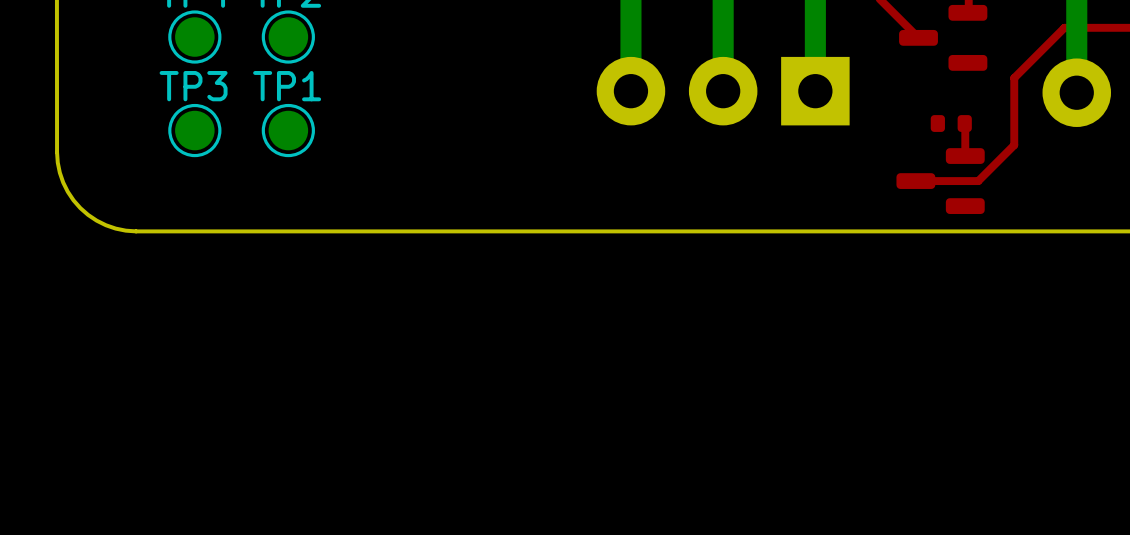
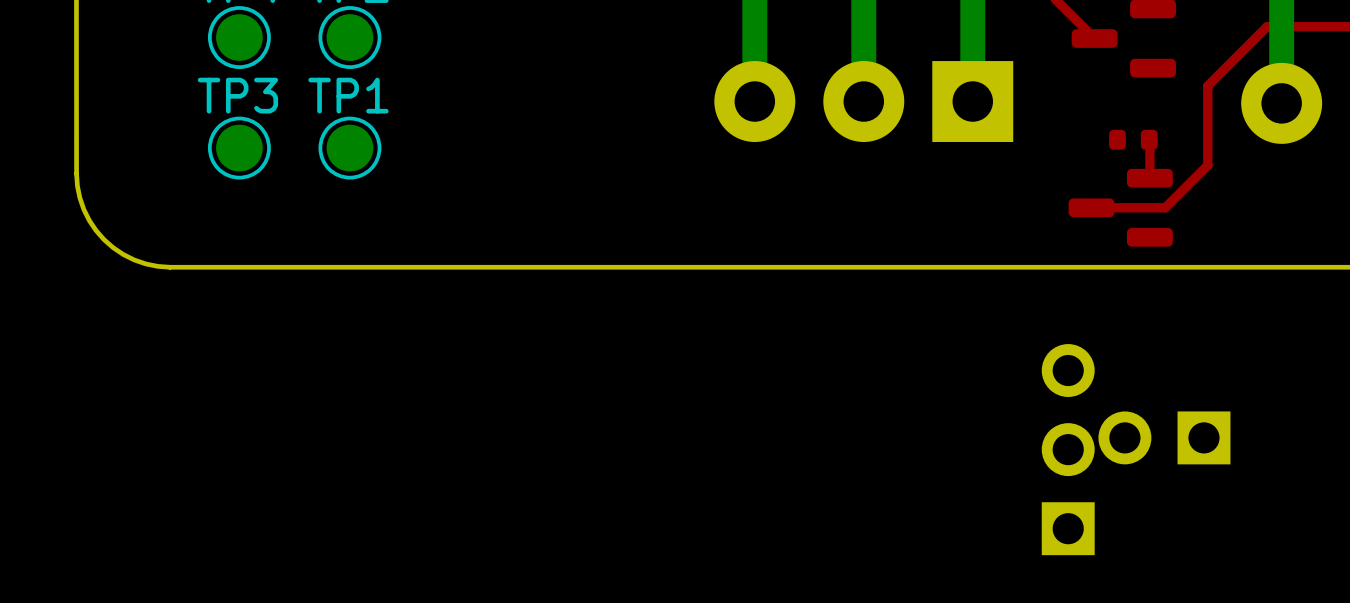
part: none -> (1164, 437)
part: none -> (1068, 449)

